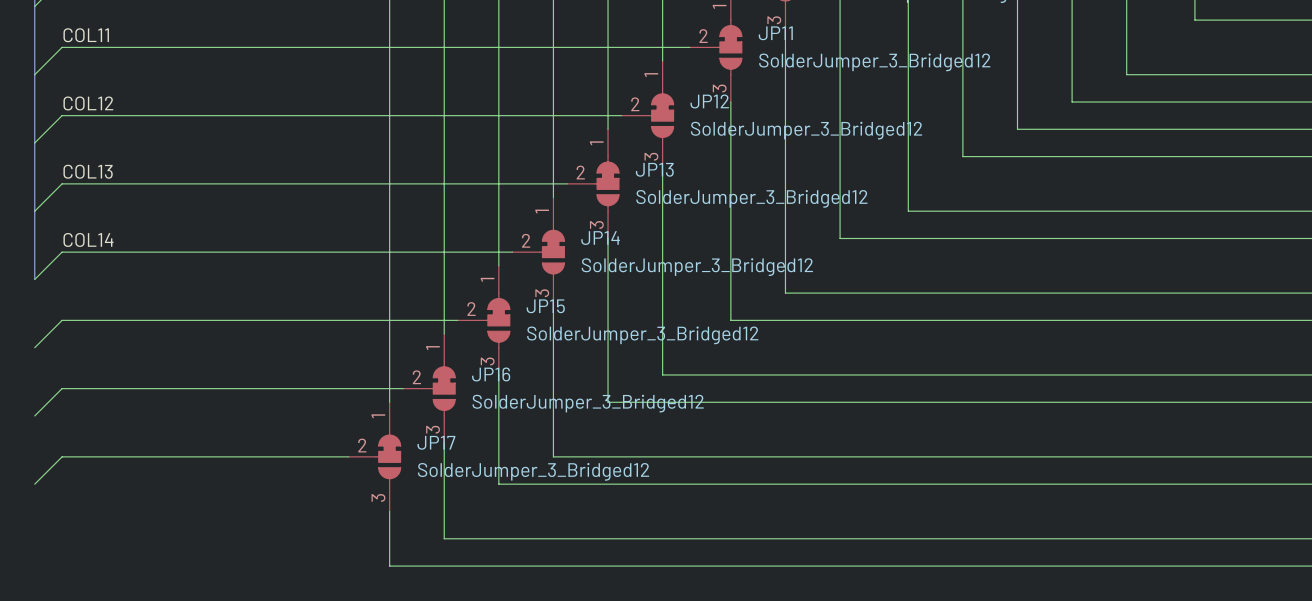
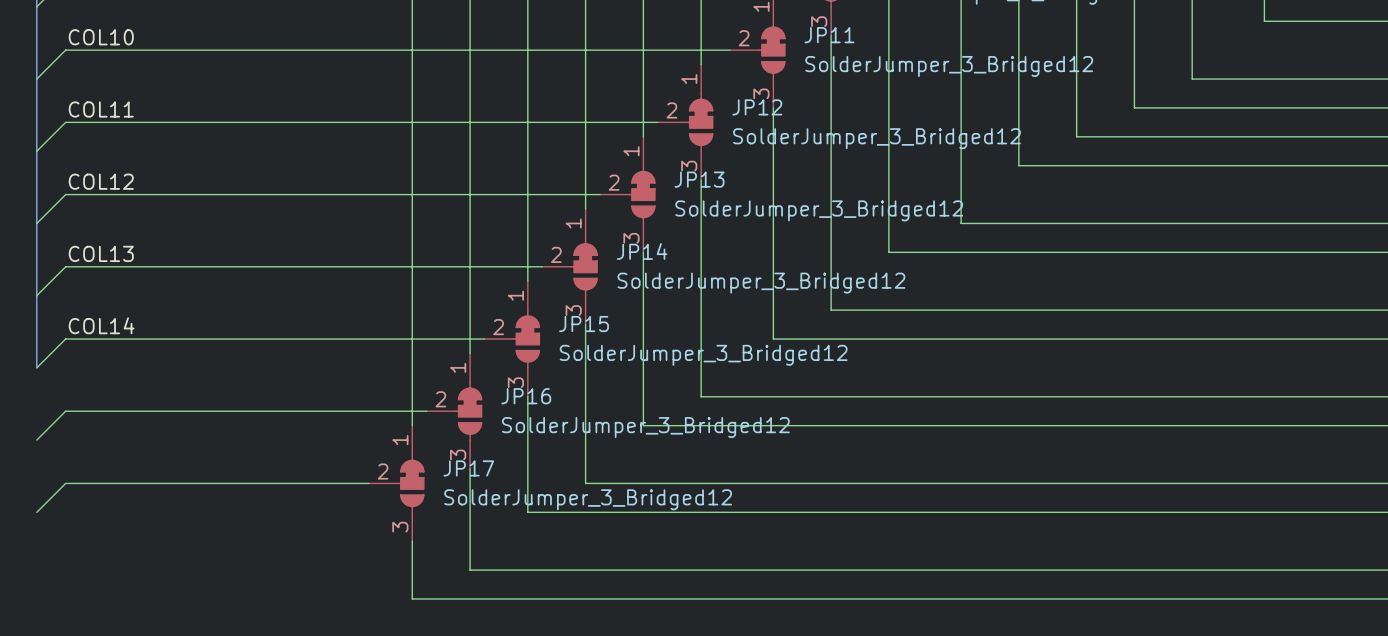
label: COL11 (86, 35) -> COL10 (101, 37)
label: COL12 (88, 103) -> COL11 (101, 109)
label: COL13 (88, 171) -> COL12 (101, 181)
label: COL14 (88, 239) -> COL13 (101, 253)
bus: none -> (36, 295) (36, 367)
label: none -> COL14 (101, 325)

